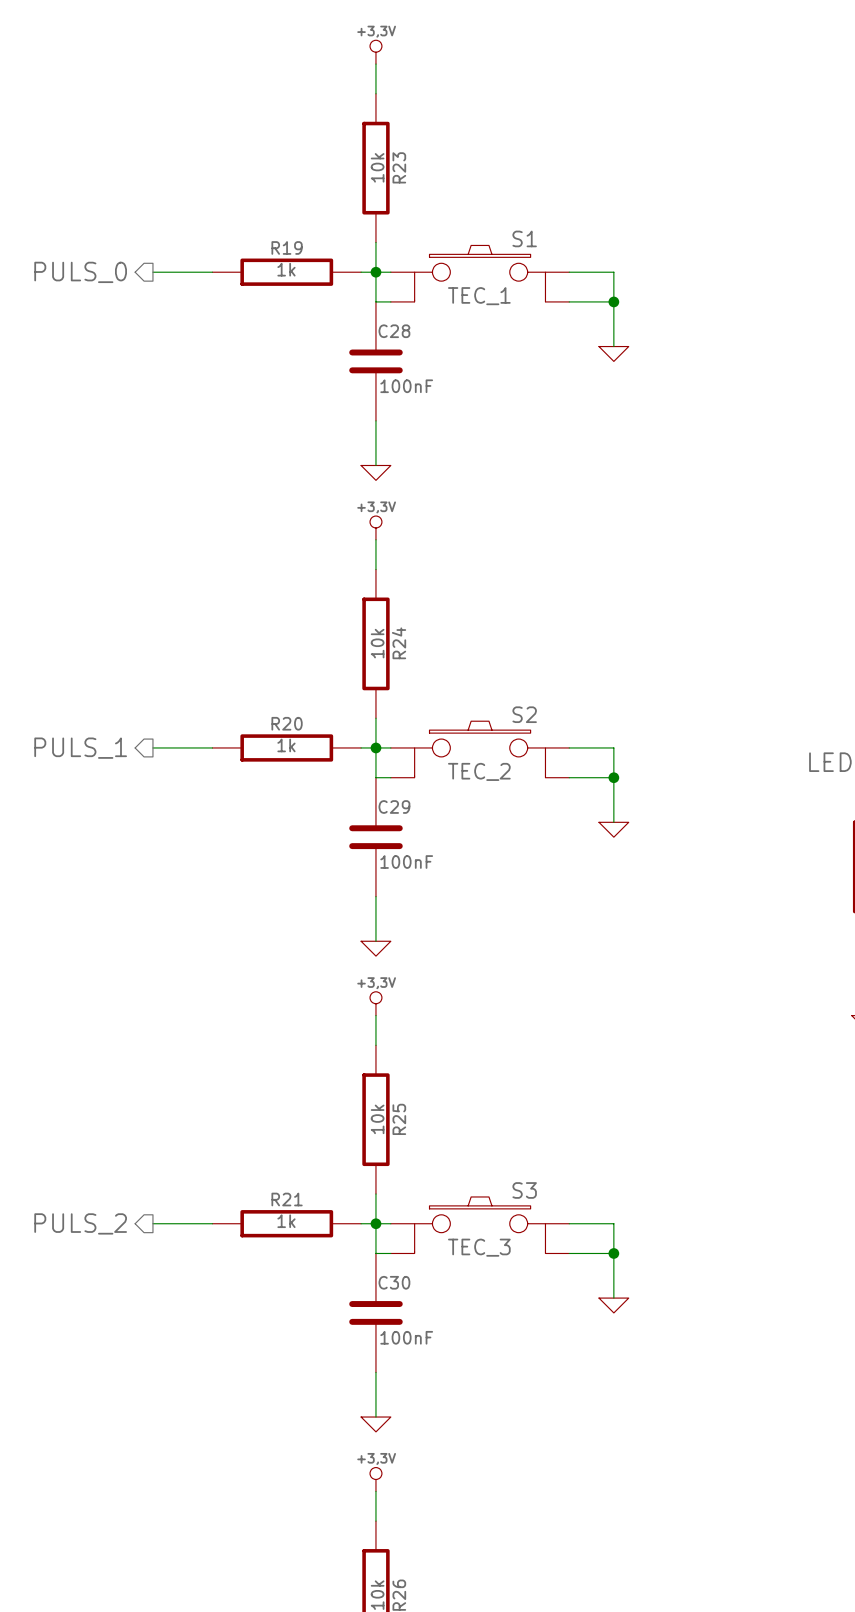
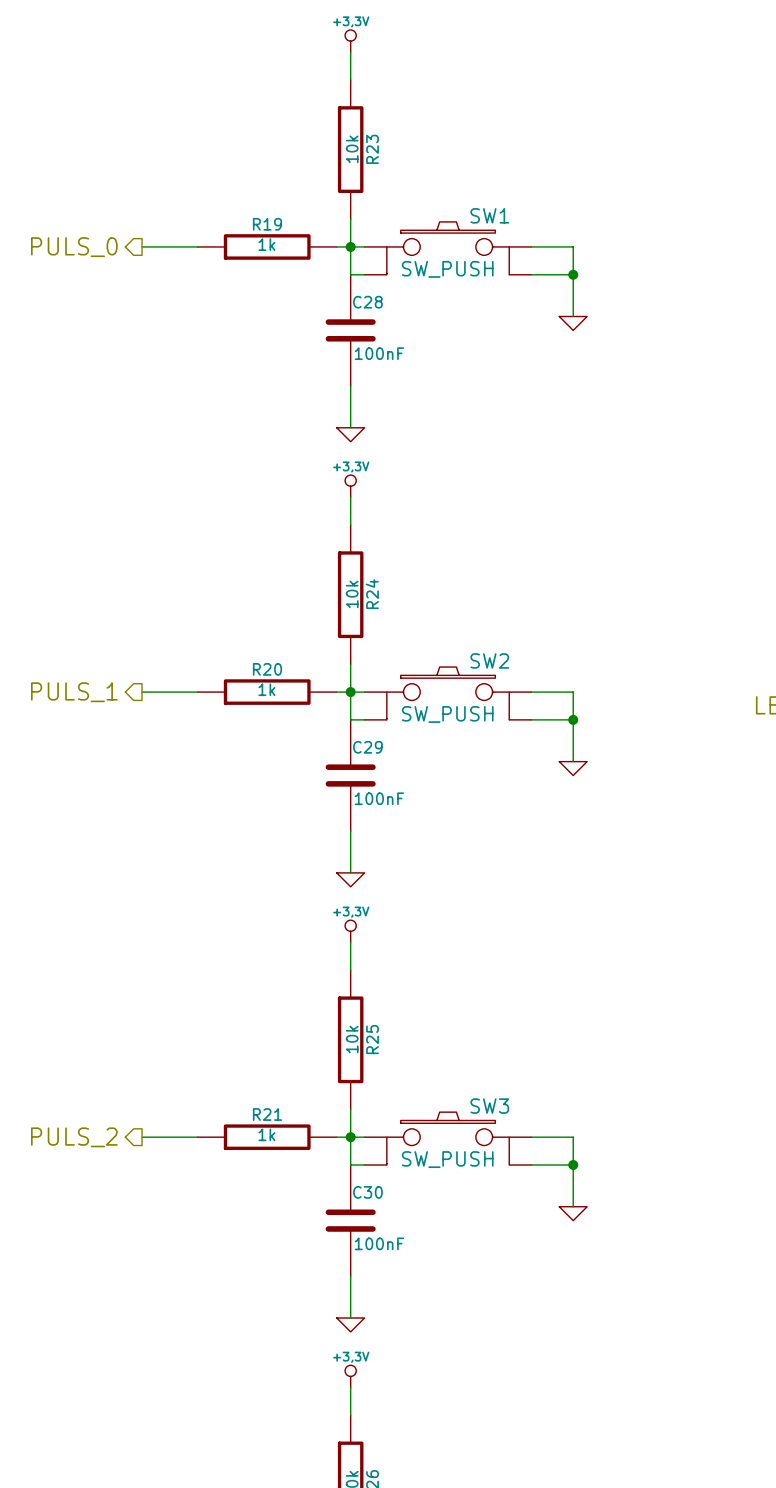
S1 name: S1 (524, 238) -> SW1 (489, 215)
S1 value: TEC_1 (479, 296) -> SW_PUSH (447, 269)
S2 name: S2 (524, 714) -> SW2 (489, 660)
S2 value: TEC_2 (479, 771) -> SW_PUSH (447, 714)
S3 name: S3 (524, 1190) -> SW3 (489, 1106)
S3 value: TEC_3 (479, 1247) -> SW_PUSH (447, 1159)

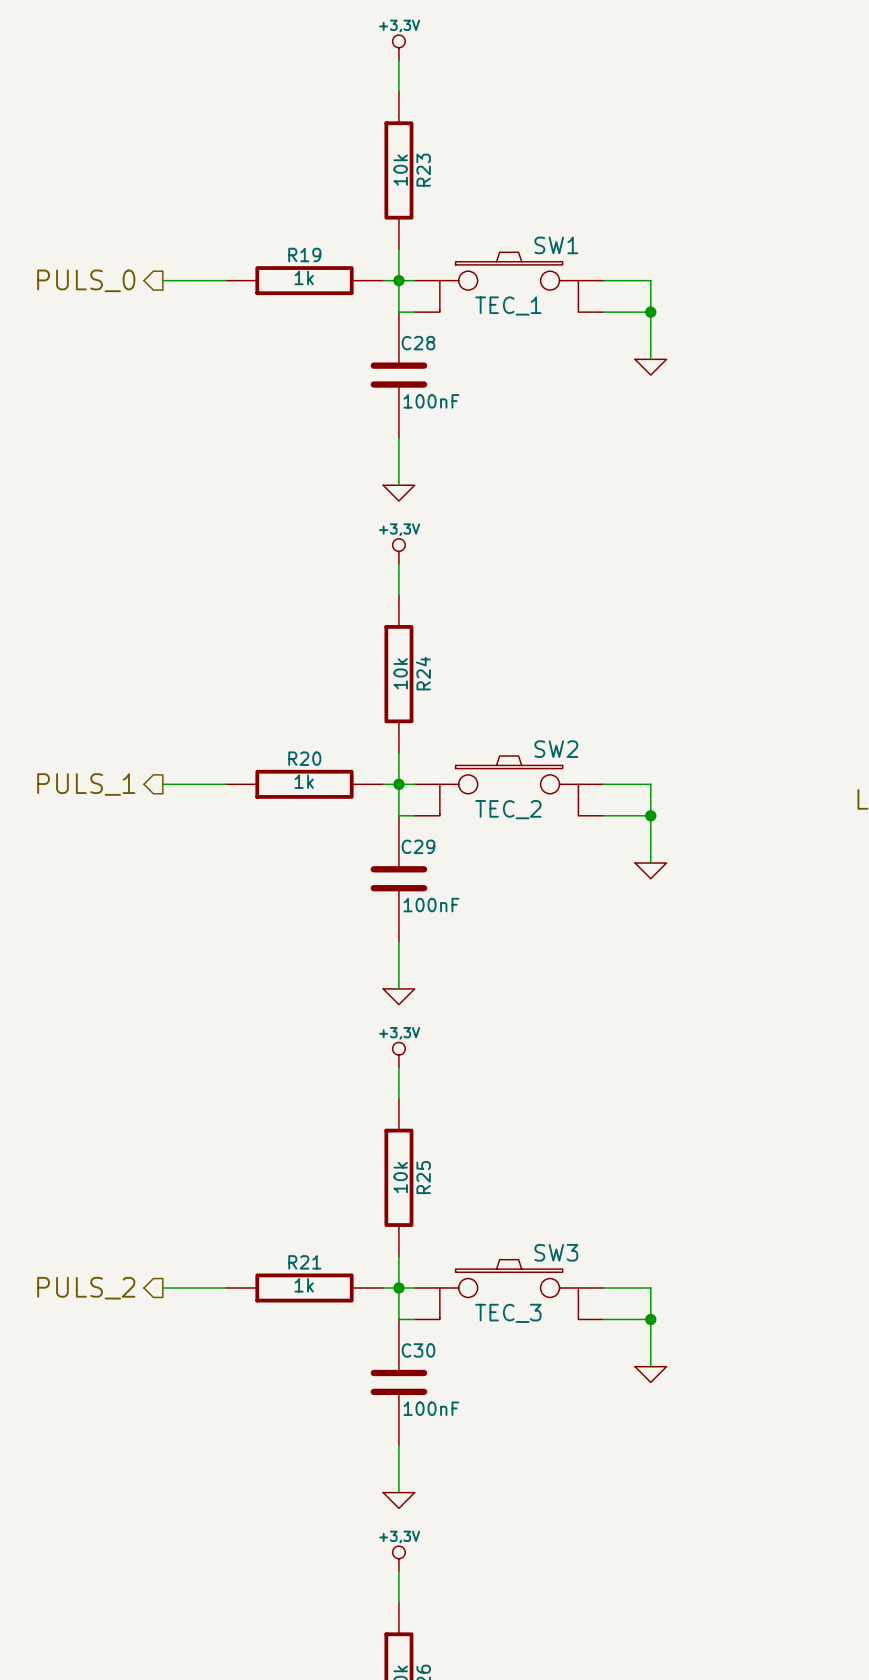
SW1 value: SW_PUSH (447, 269) -> TEC_1 (508, 305)
SW2 value: SW_PUSH (447, 714) -> TEC_2 (508, 809)
SW3 value: SW_PUSH (447, 1159) -> TEC_3 (508, 1313)

